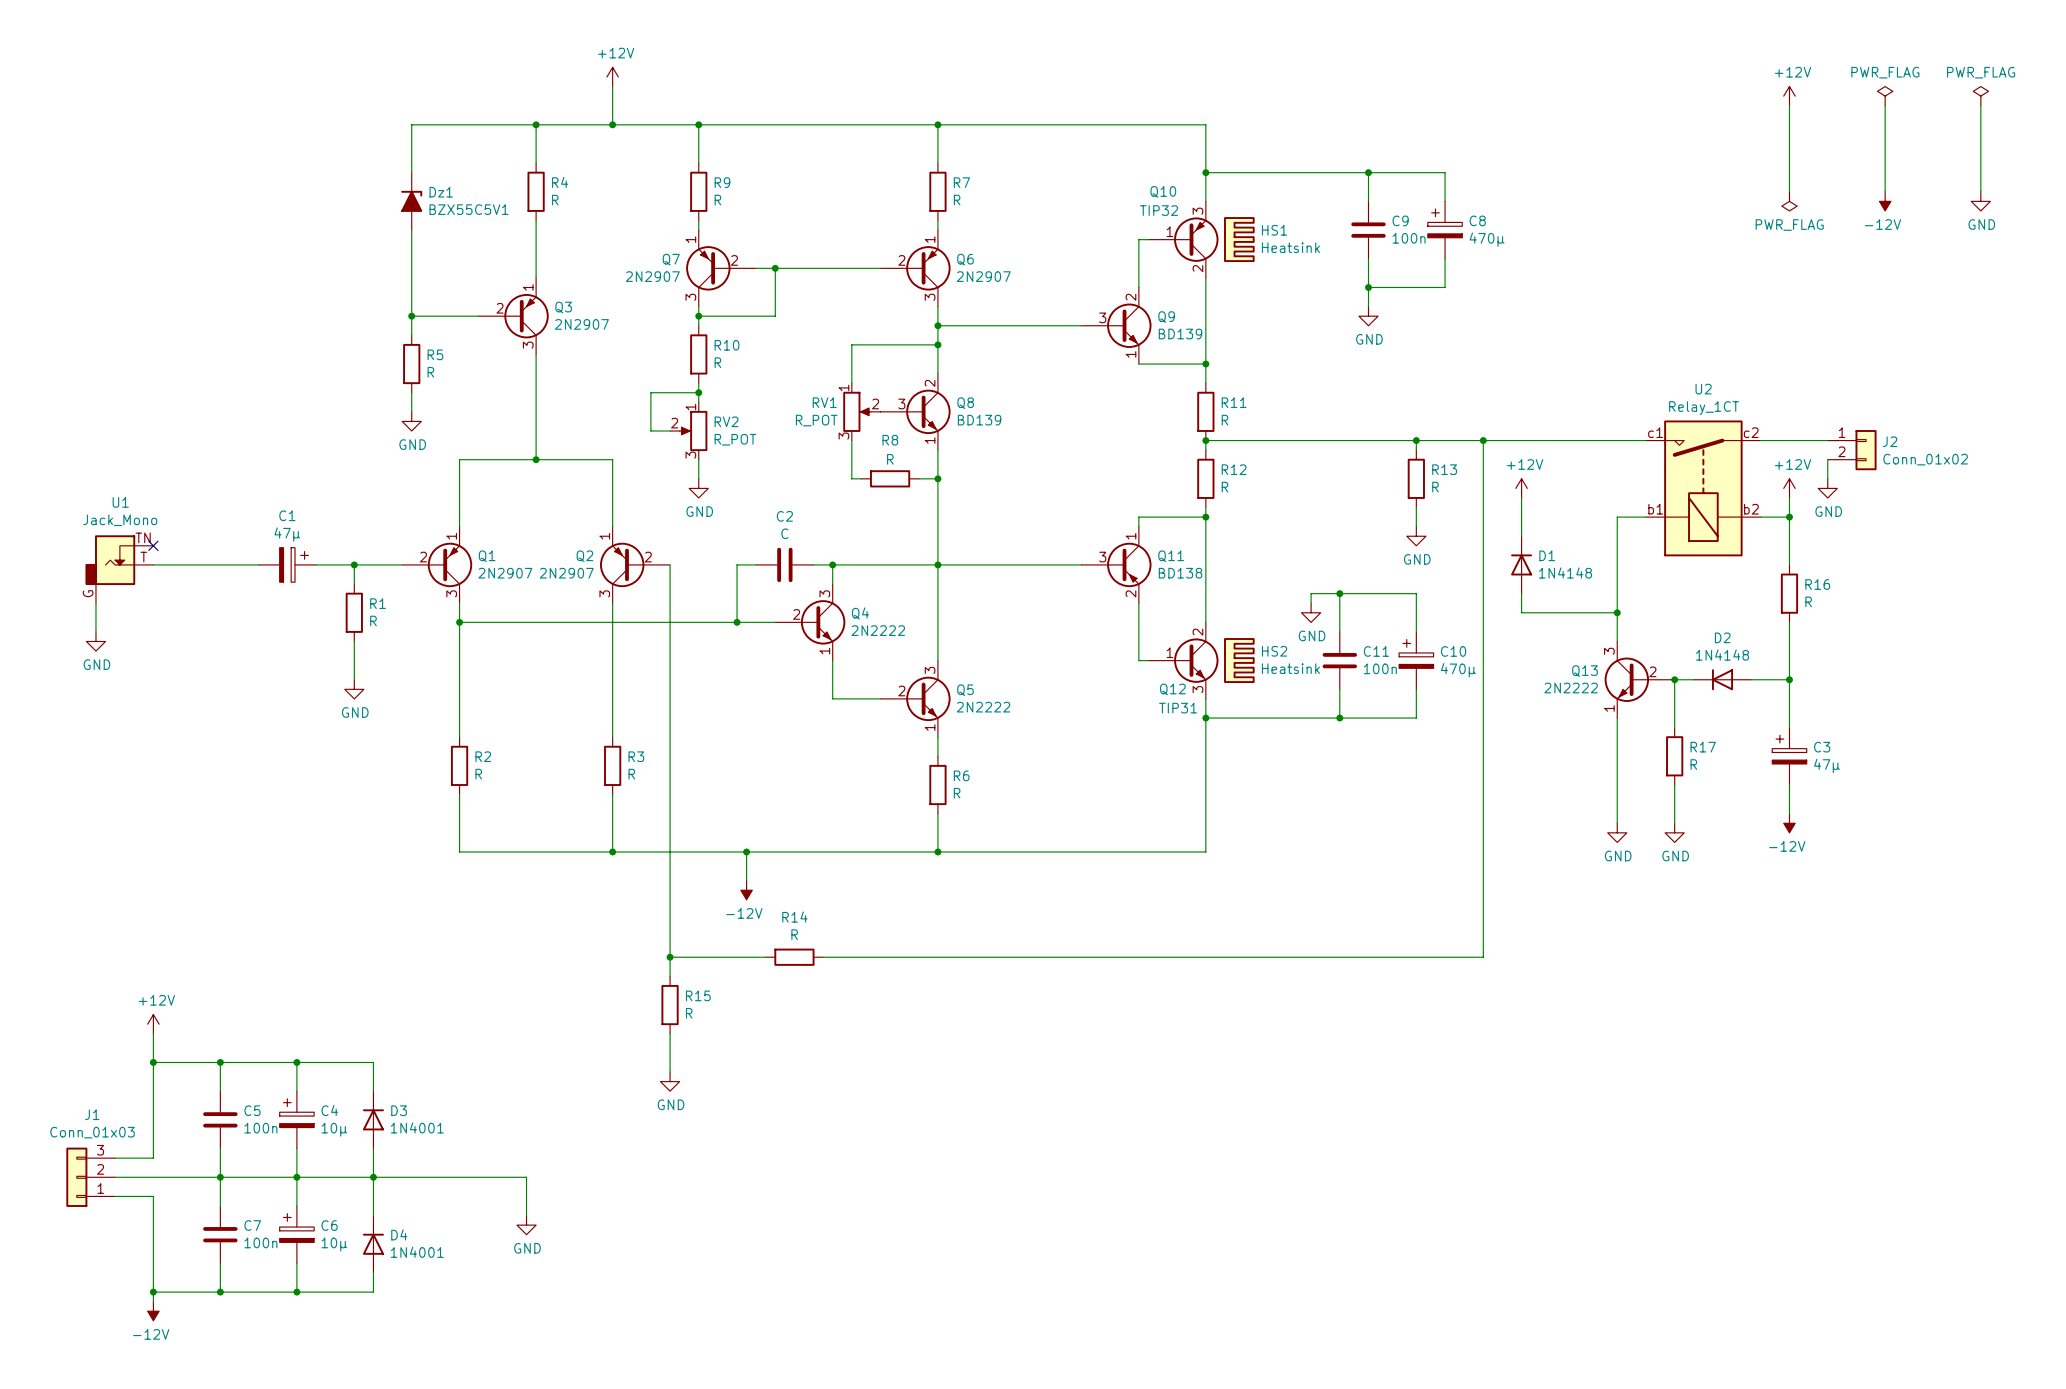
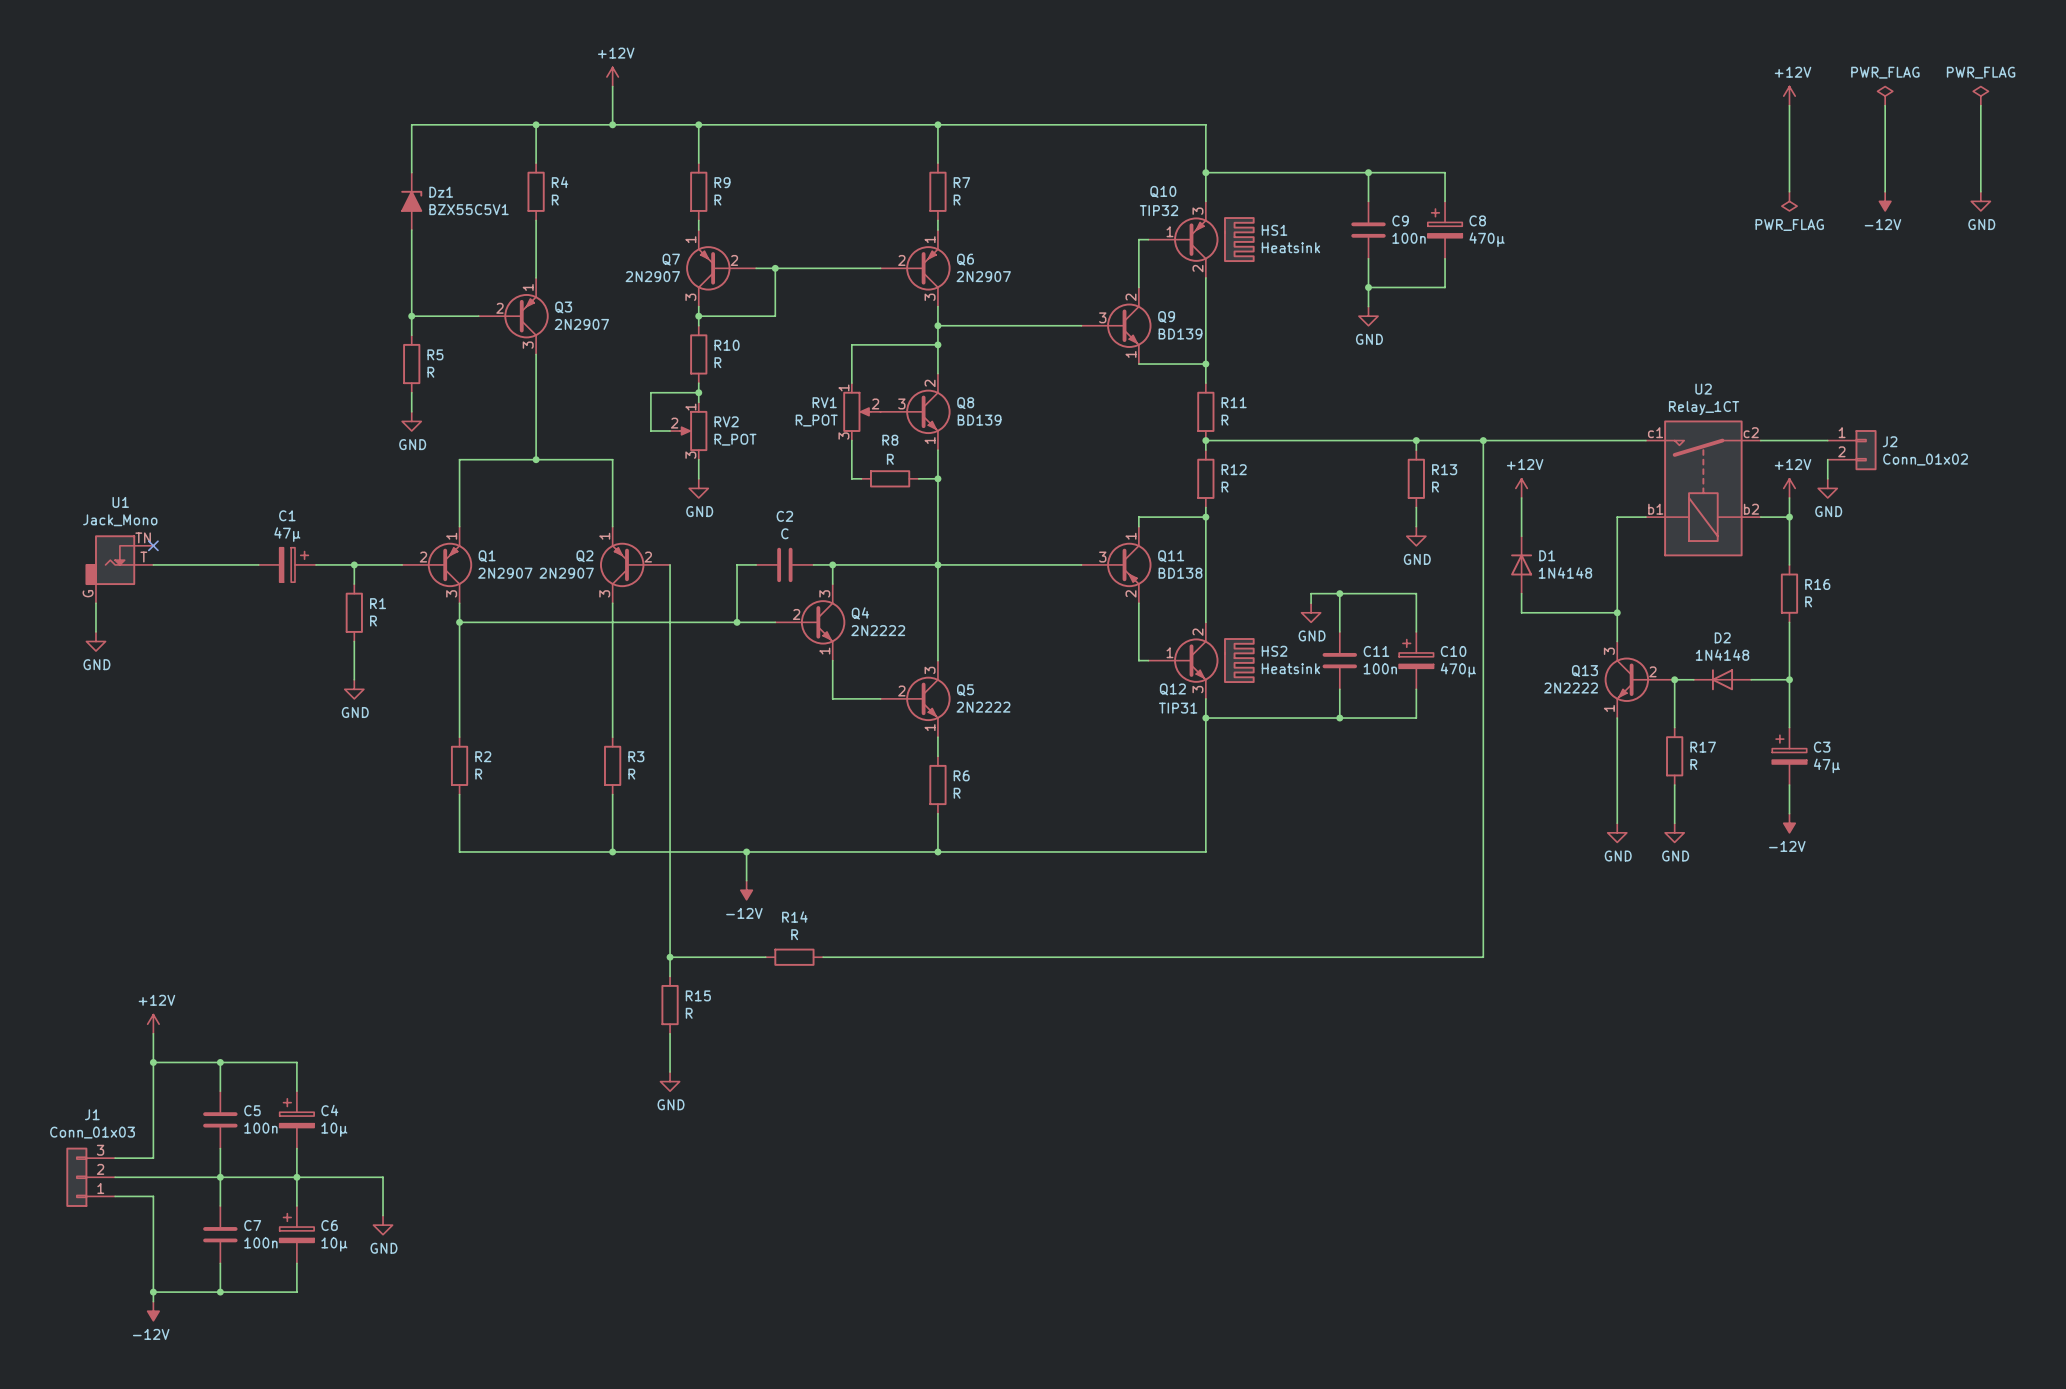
wire: (296, 1062) (373, 1062) (373, 1091) -> none
junction: (296, 1062) -> none
D3: 1N4001 (373, 1119) -> none
wire: (373, 1148) (373, 1215) -> none
junction: (373, 1177) -> none
wire: (383, 1177) (526, 1177) (526, 1215) -> (383, 1177) (383, 1215)
power symbol position: GND (526, 1225) -> GND (383, 1225)
D4: 1N4001 (373, 1244) -> none
wire: (373, 1272) (373, 1292) (296, 1292) -> none
junction: (296, 1292) -> none

